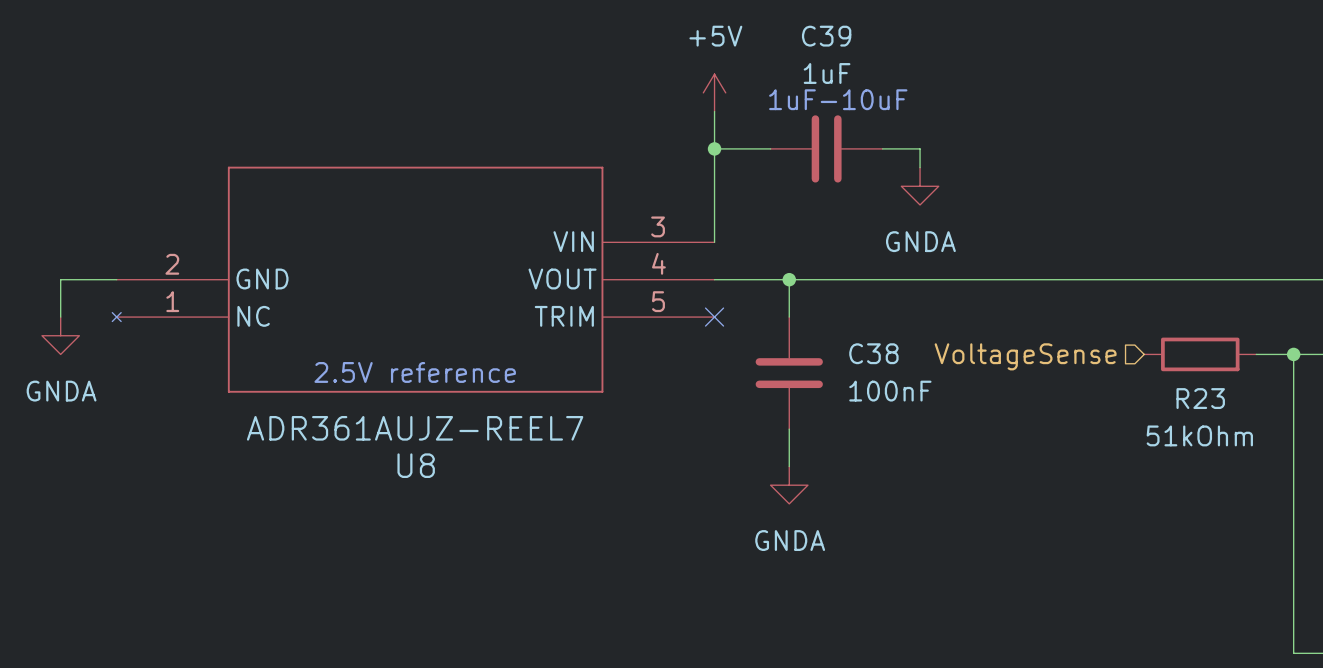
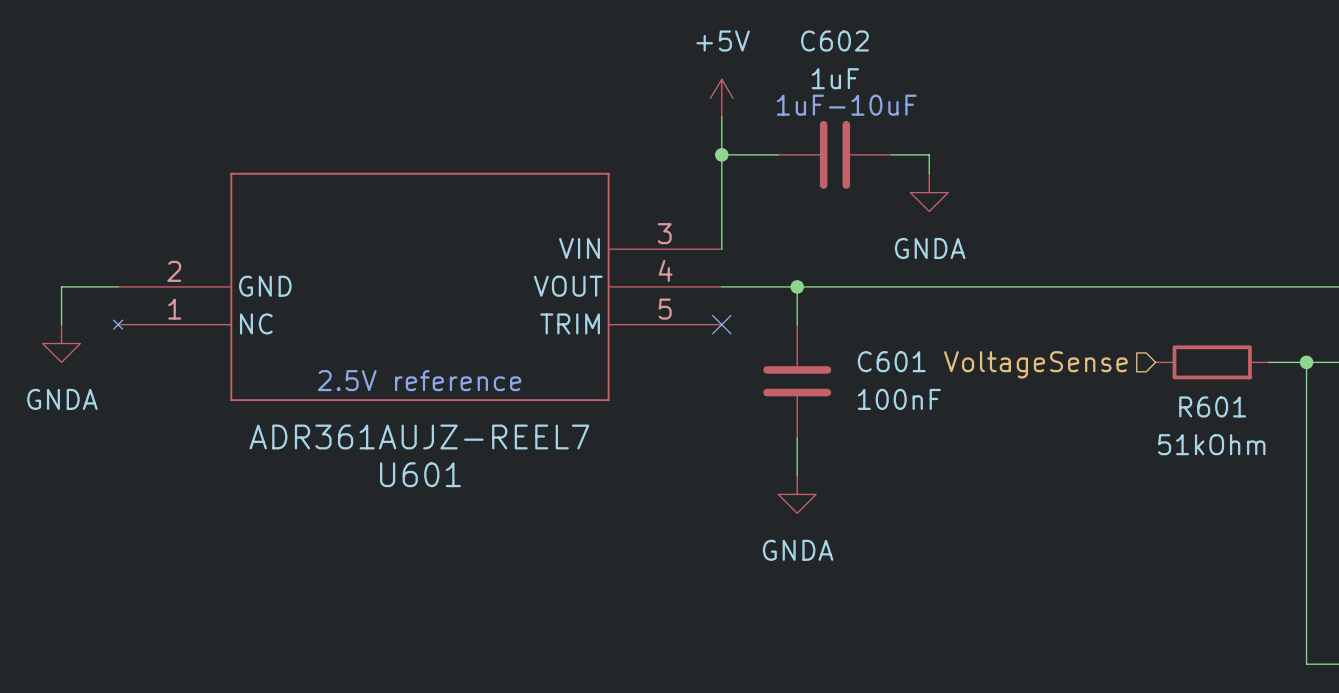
C39 name: C39 (826, 36) -> C602 (834, 40)
C38 name: C38 (873, 353) -> C601 (891, 361)
R23 name: R23 (1200, 398) -> R601 (1212, 406)
U8 name: U8 (416, 465) -> U601 (420, 474)

